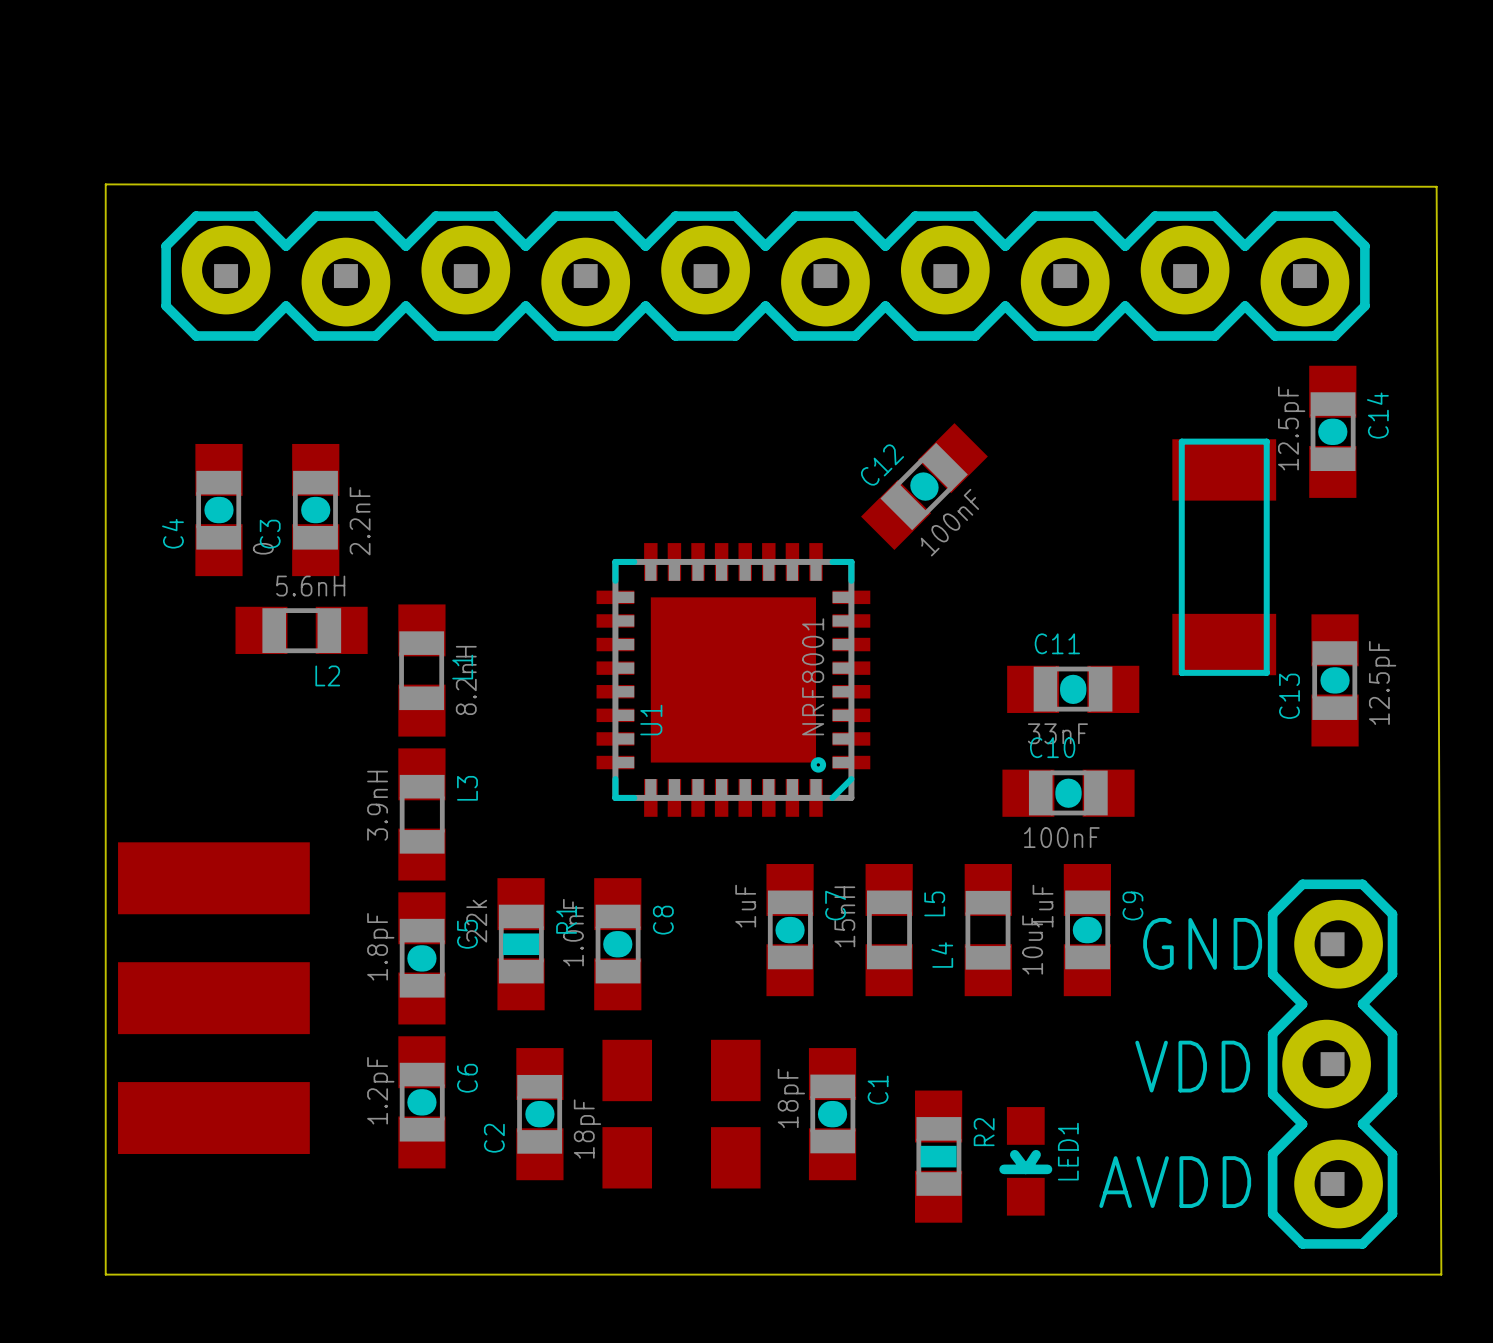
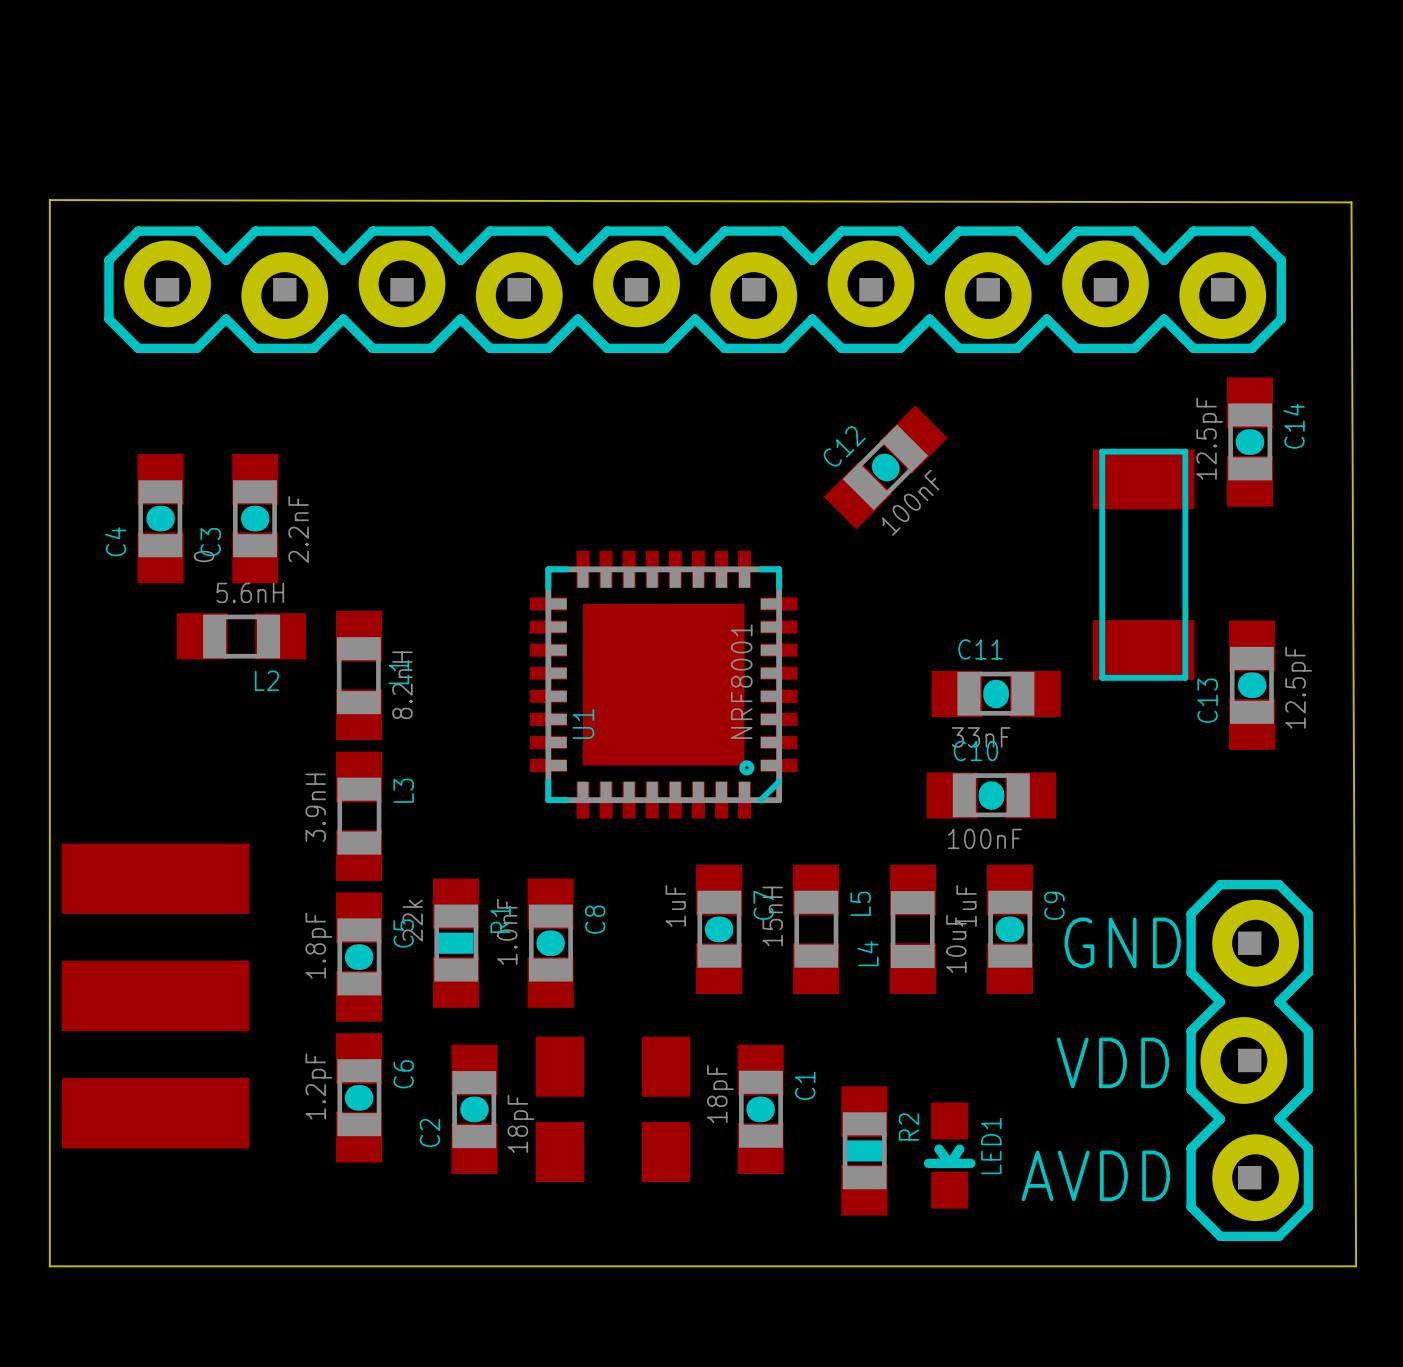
C12 position: (924, 486) -> (885, 467)

